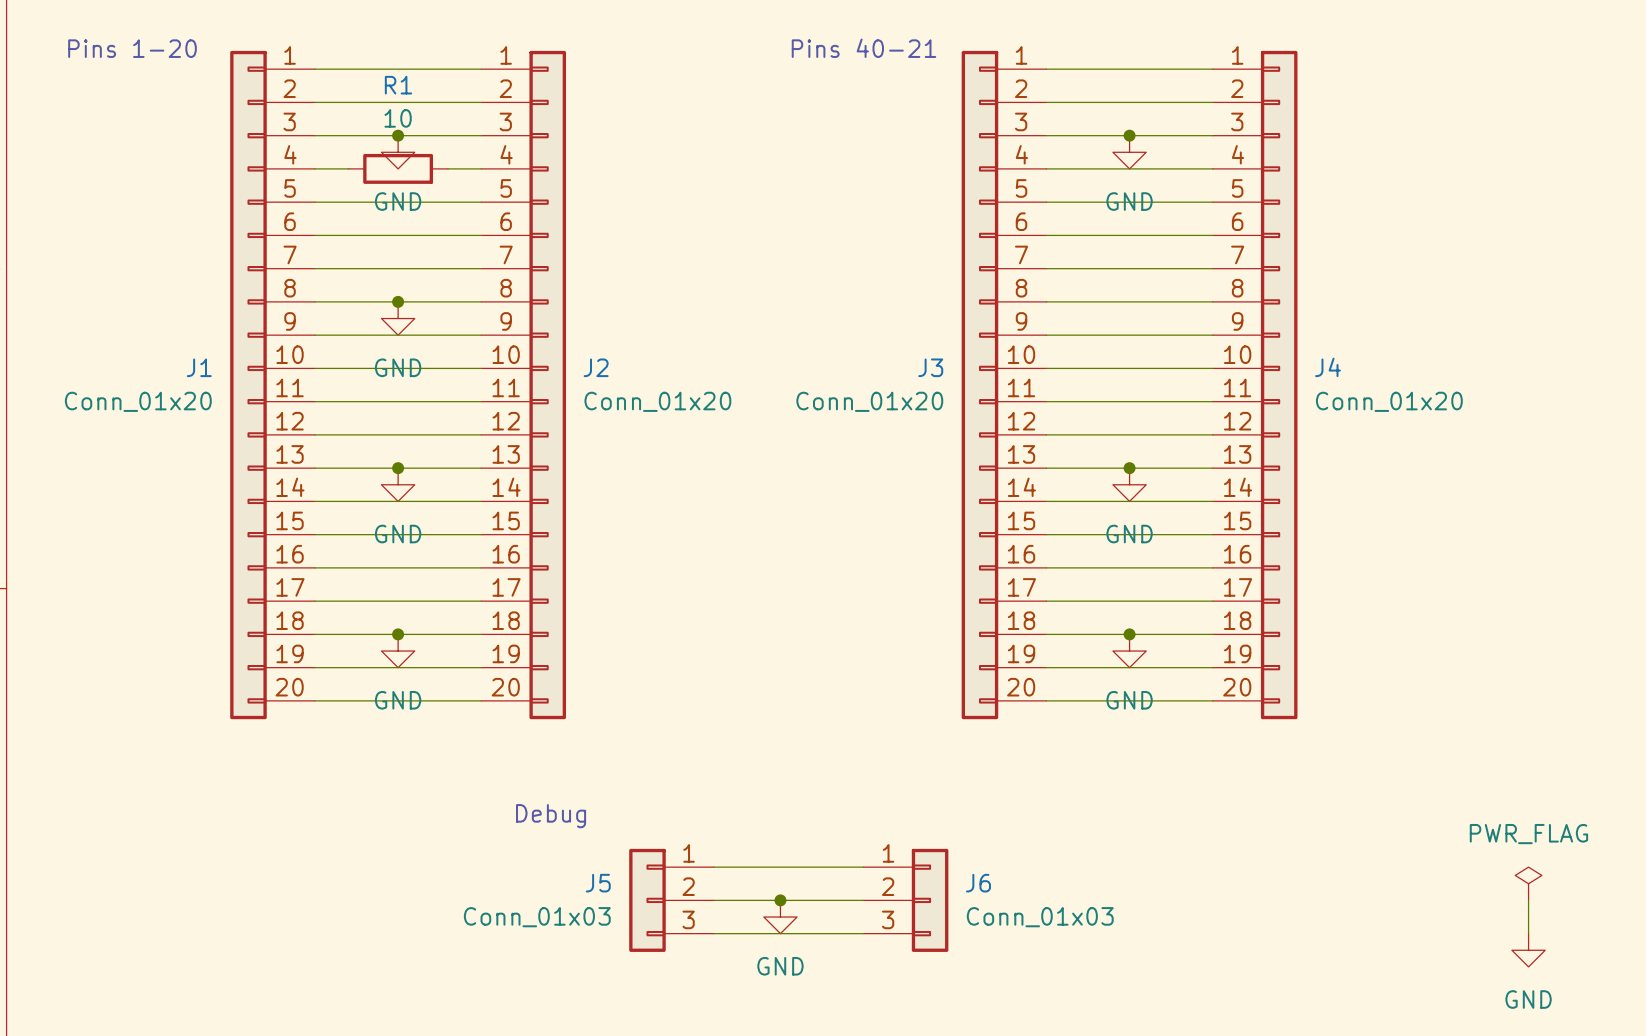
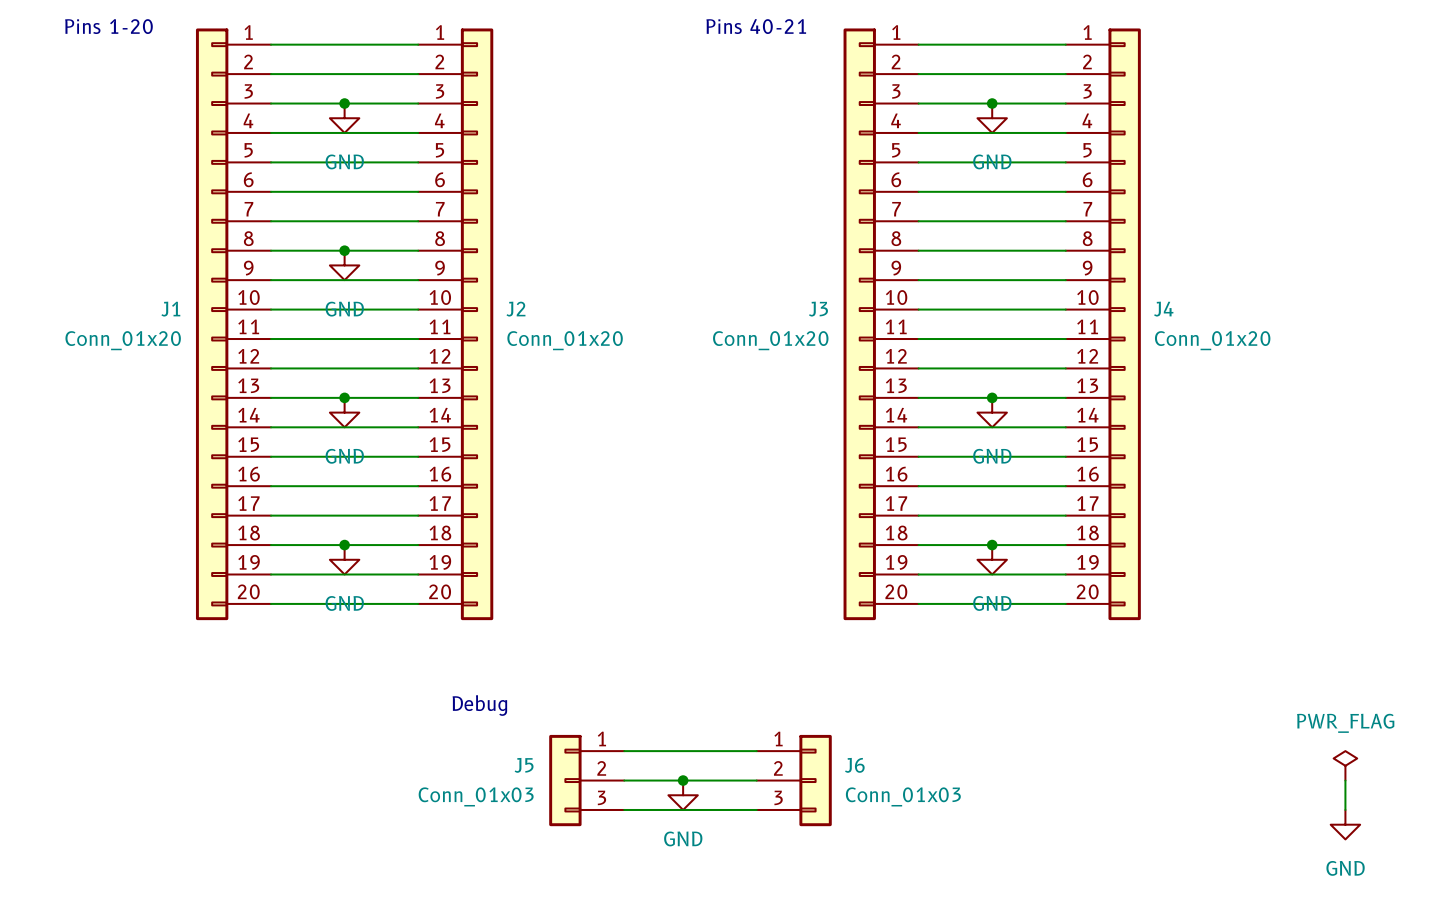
wire: none -> (300, 132) (388, 132)
R1: 10 (398, 168) -> none

